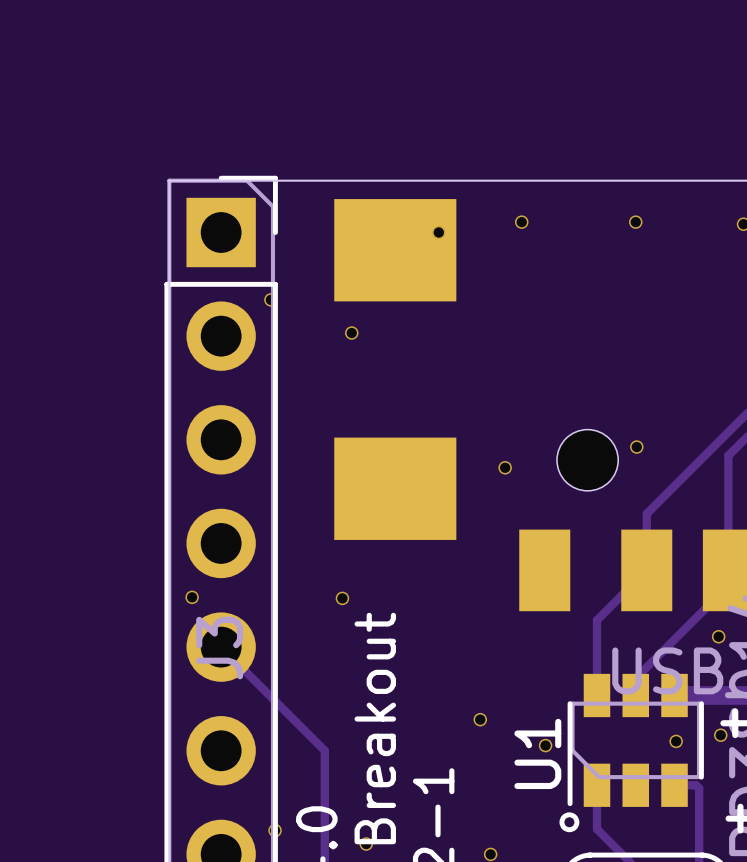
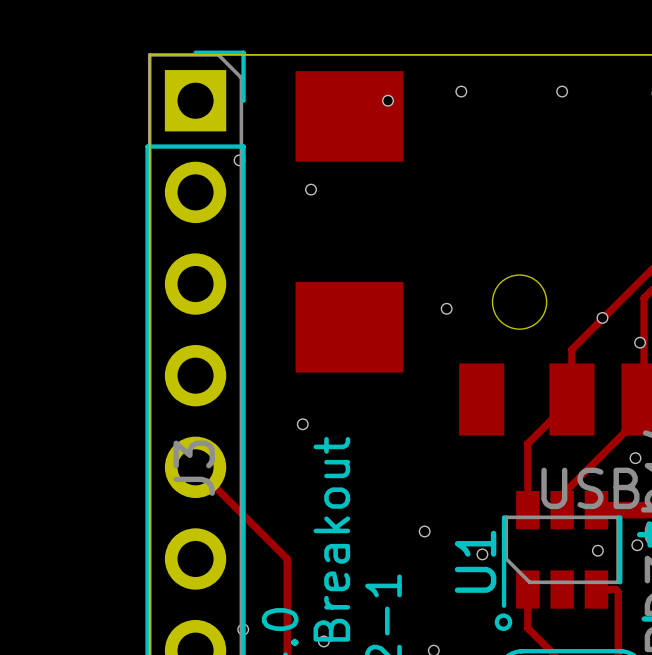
via: (636, 447) -> none
via: none -> (602, 317)
via: none -> (640, 342)
via: (192, 597) -> none

